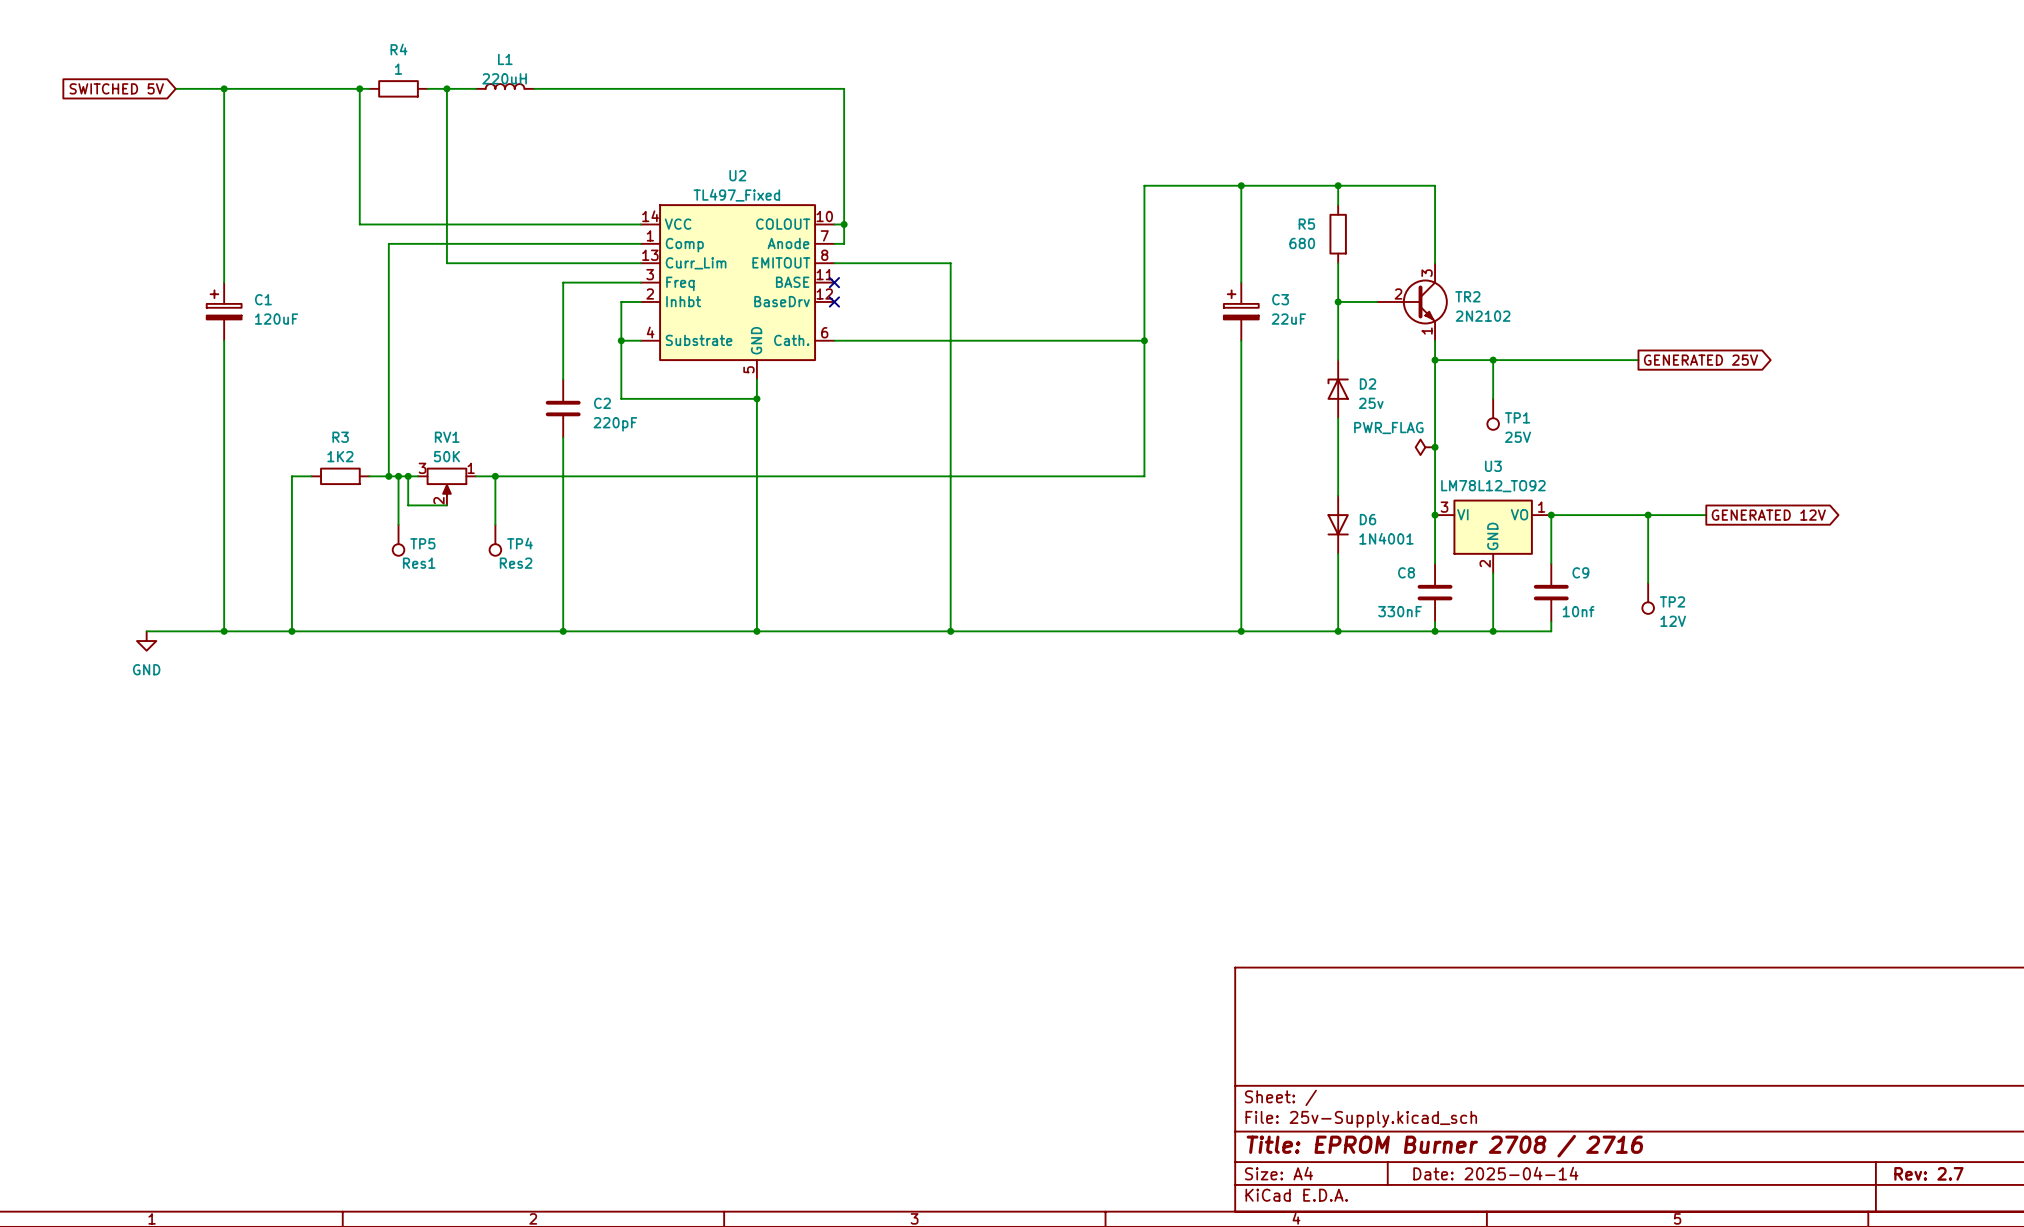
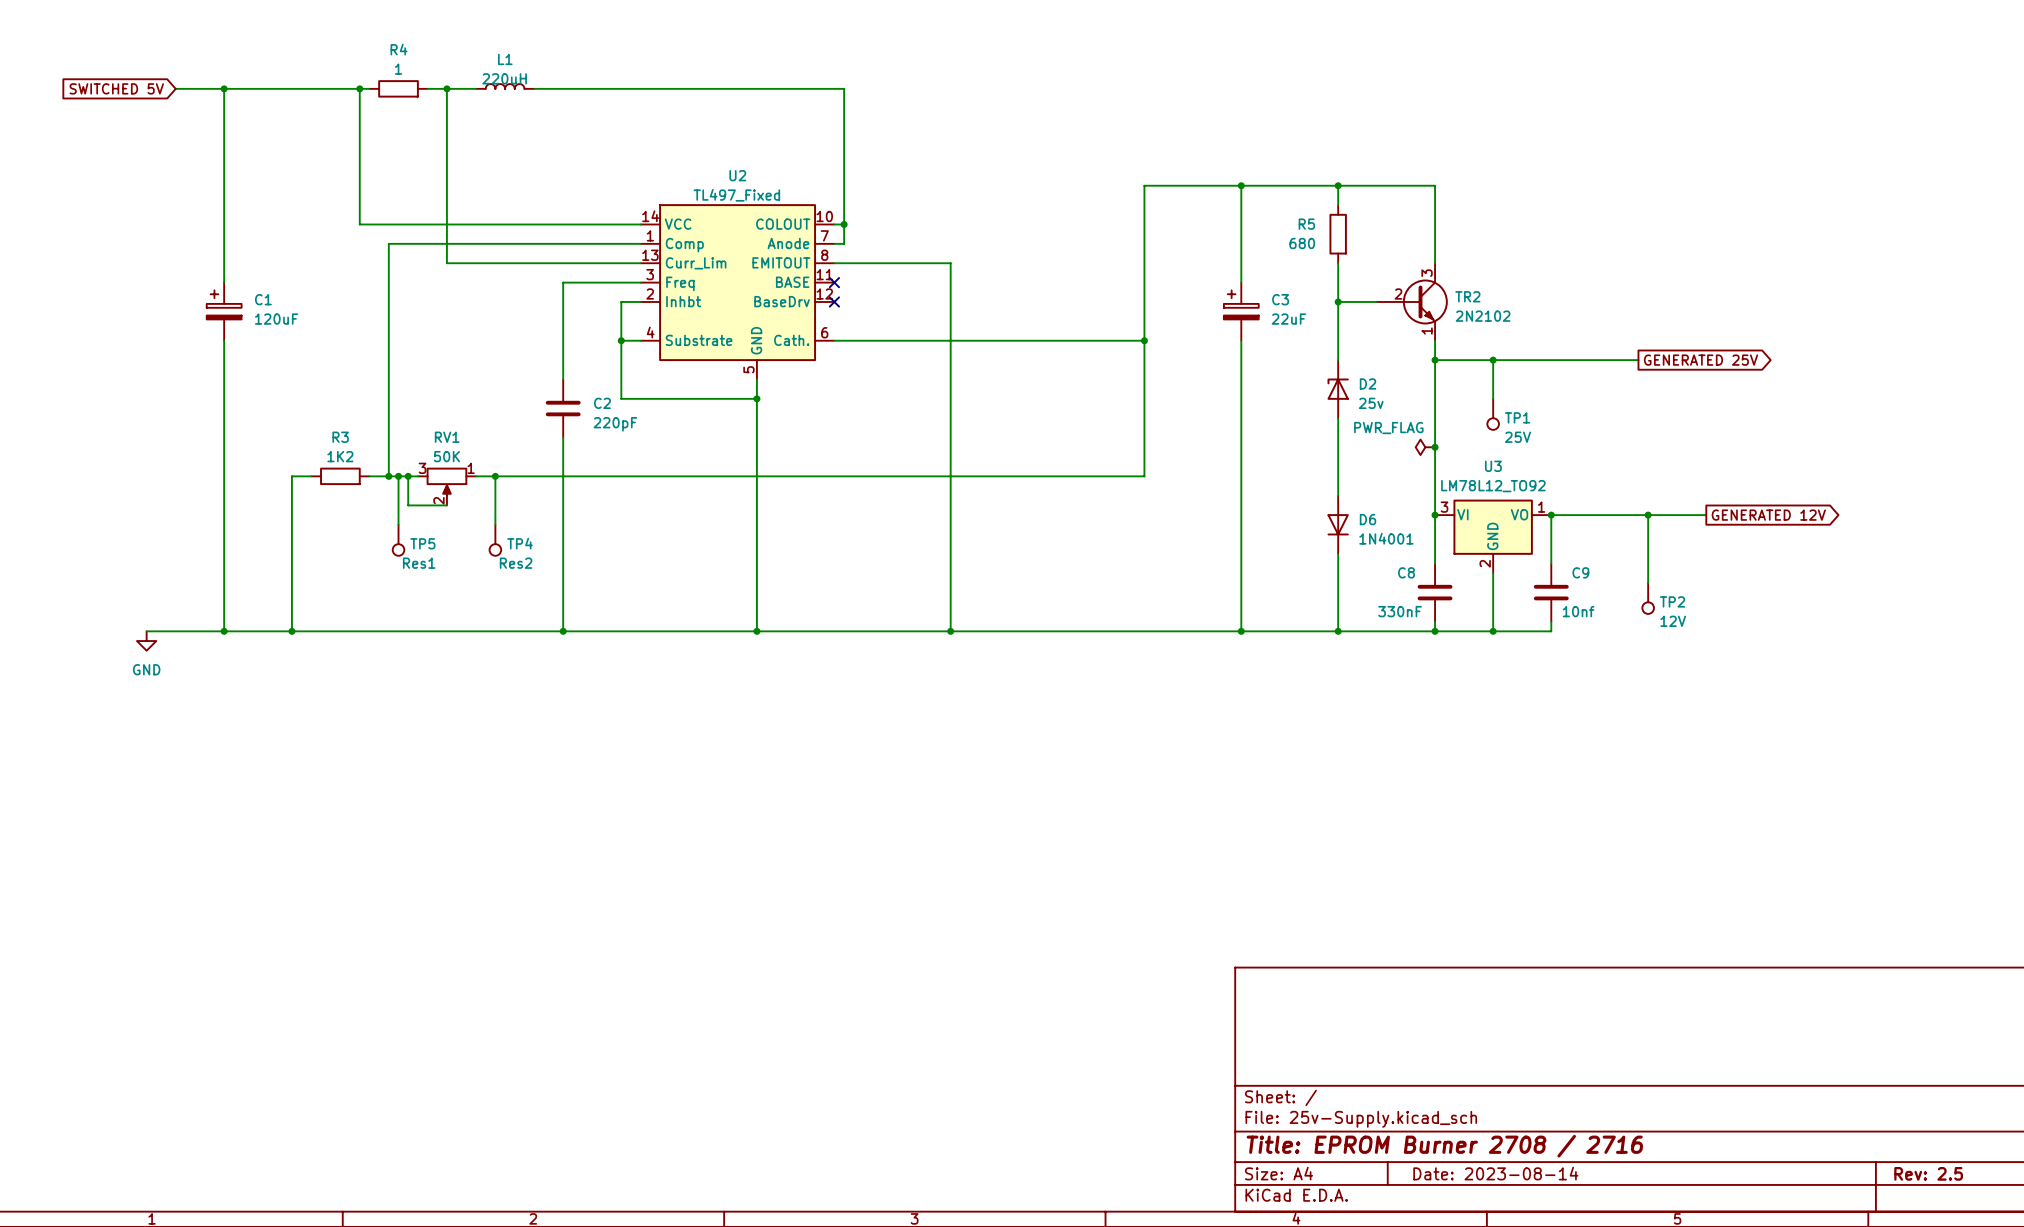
title block: Date: 2025-04-14 (1495, 1173) -> Date: 2023-08-14 (1495, 1173)
title block: Rev: 2.7 (1928, 1173) -> Rev: 2.5 (1928, 1173)

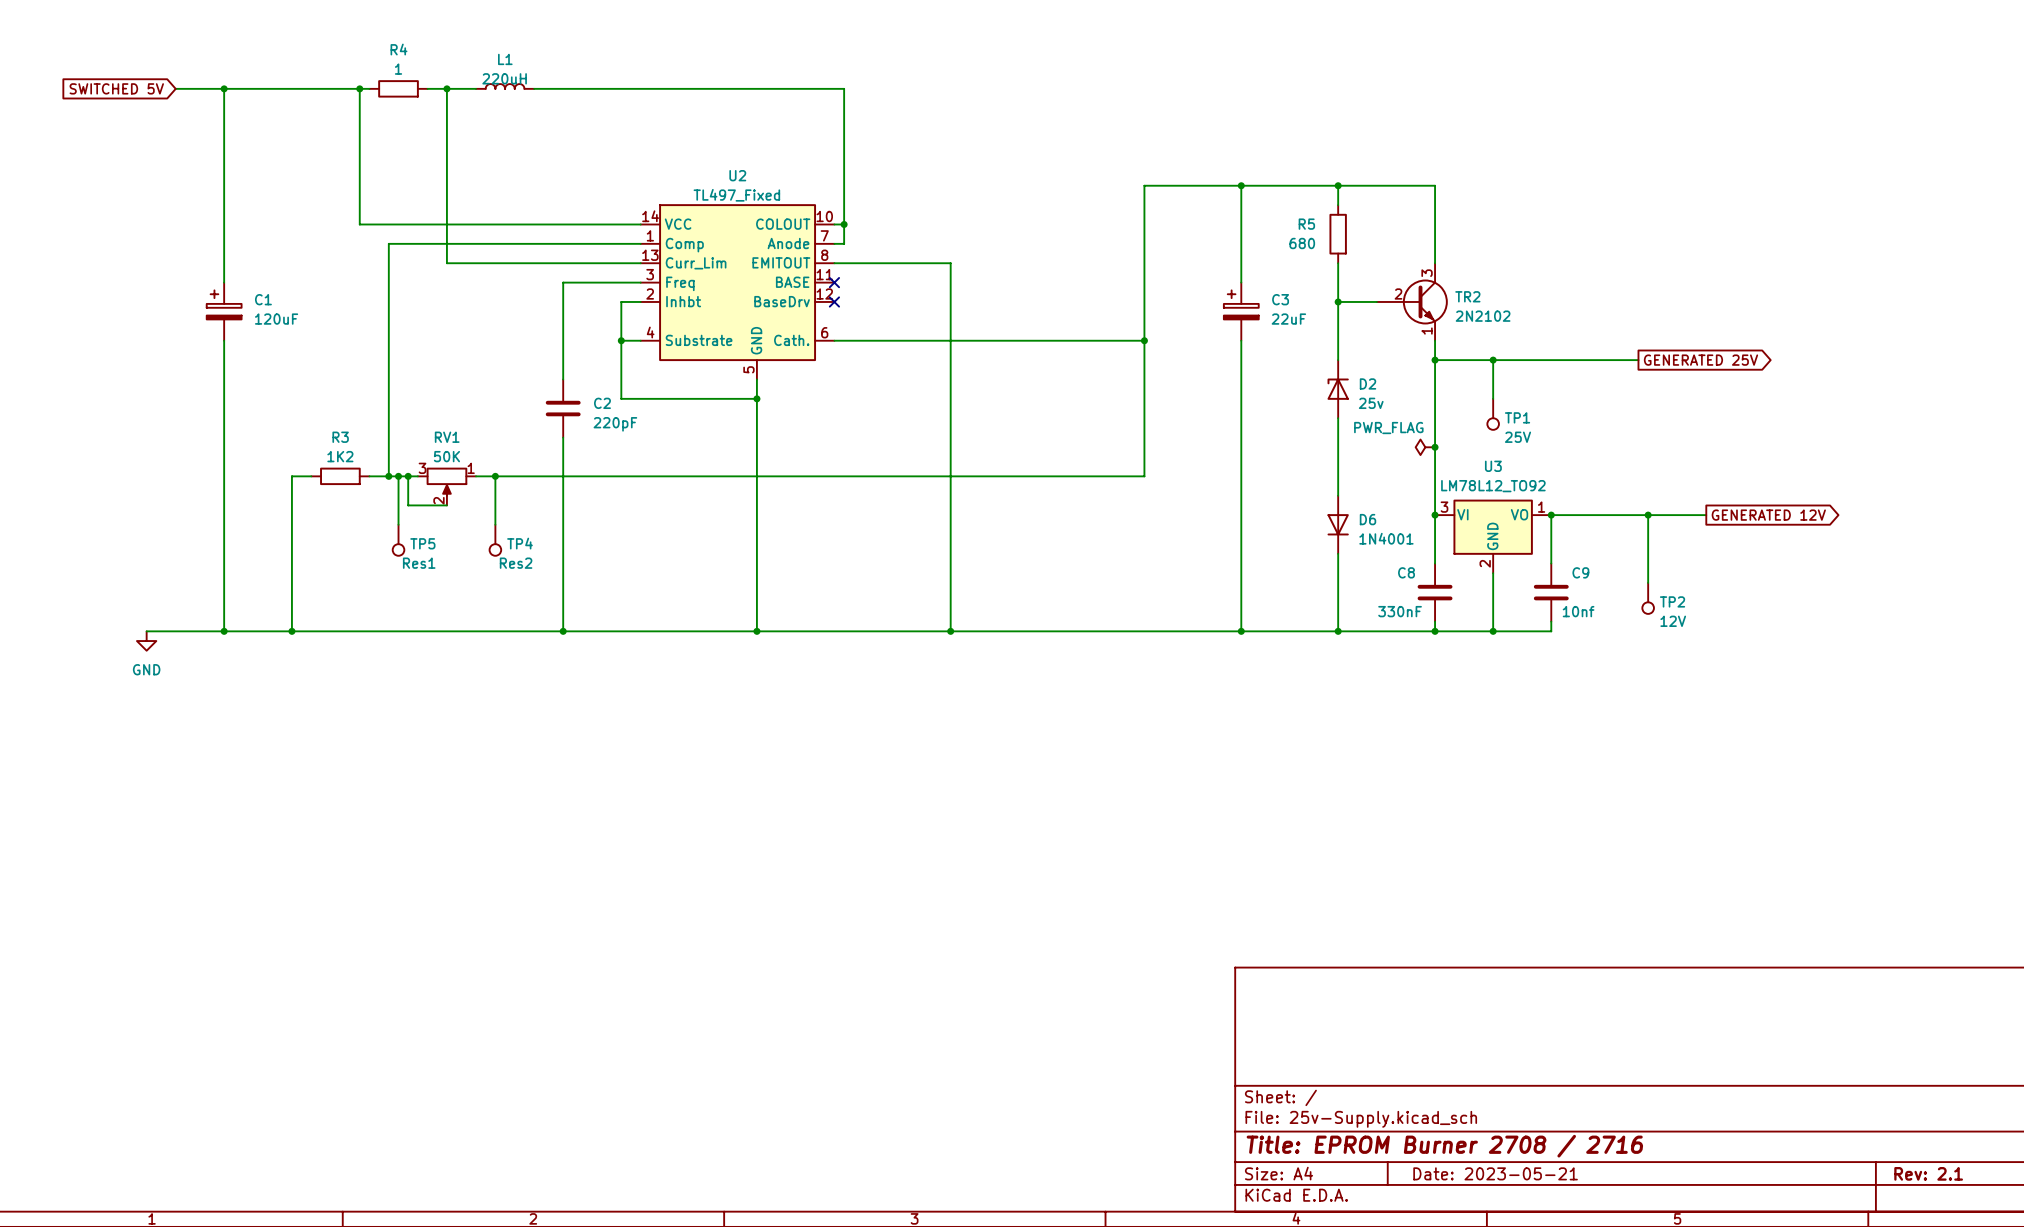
title block: Date: 2023-08-14 (1495, 1173) -> Date: 2023-05-21 (1495, 1173)
title block: Rev: 2.5 (1928, 1173) -> Rev: 2.1 (1928, 1173)

